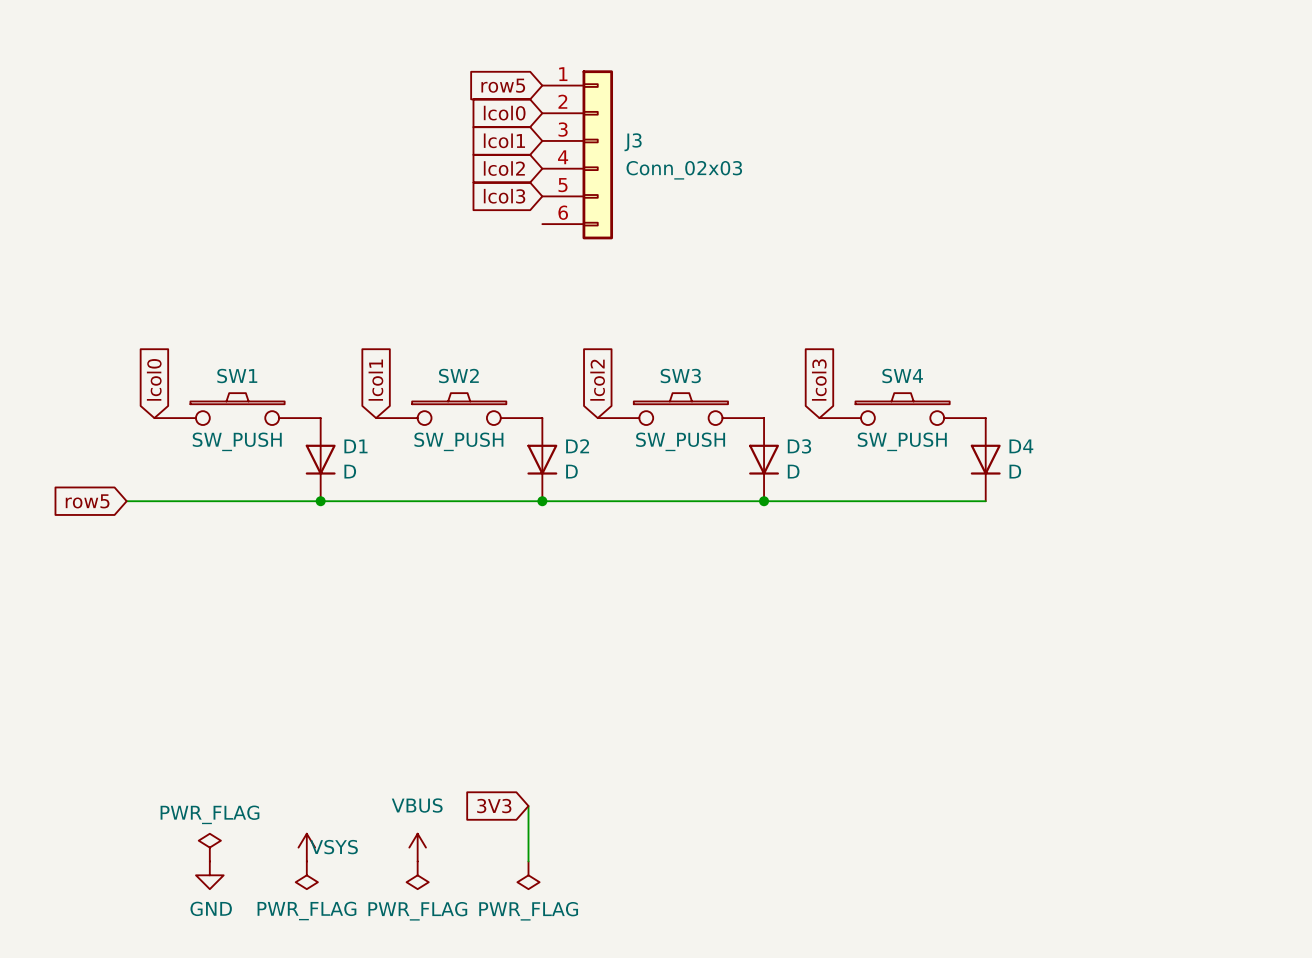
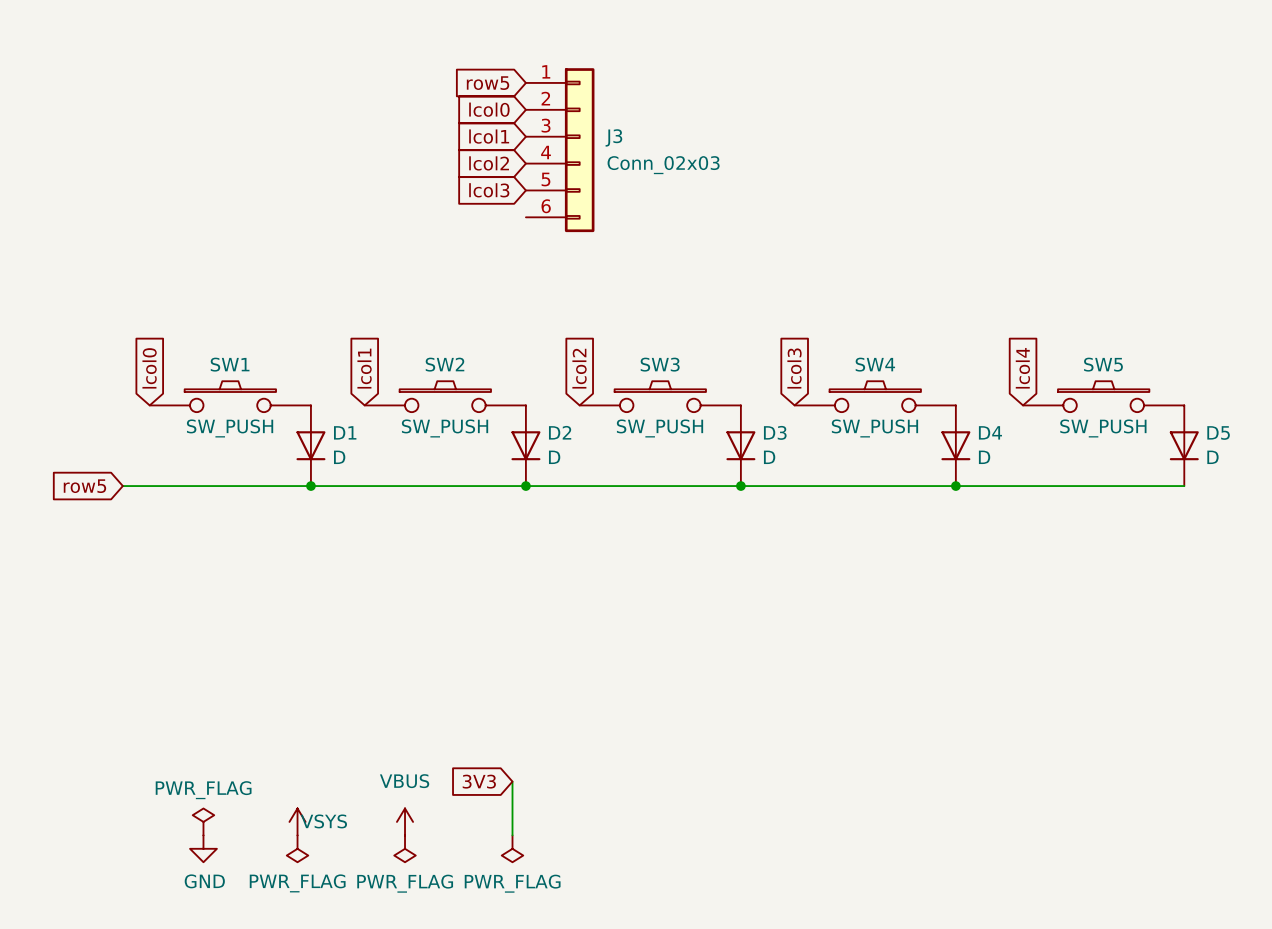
global label: none -> lcol4 (1022, 368)
SW5: none -> SW_PUSH (1103, 396)
D5: none -> D (1184, 445)
wire: none -> (955, 486) (1184, 486)
junction: none -> (955, 486)

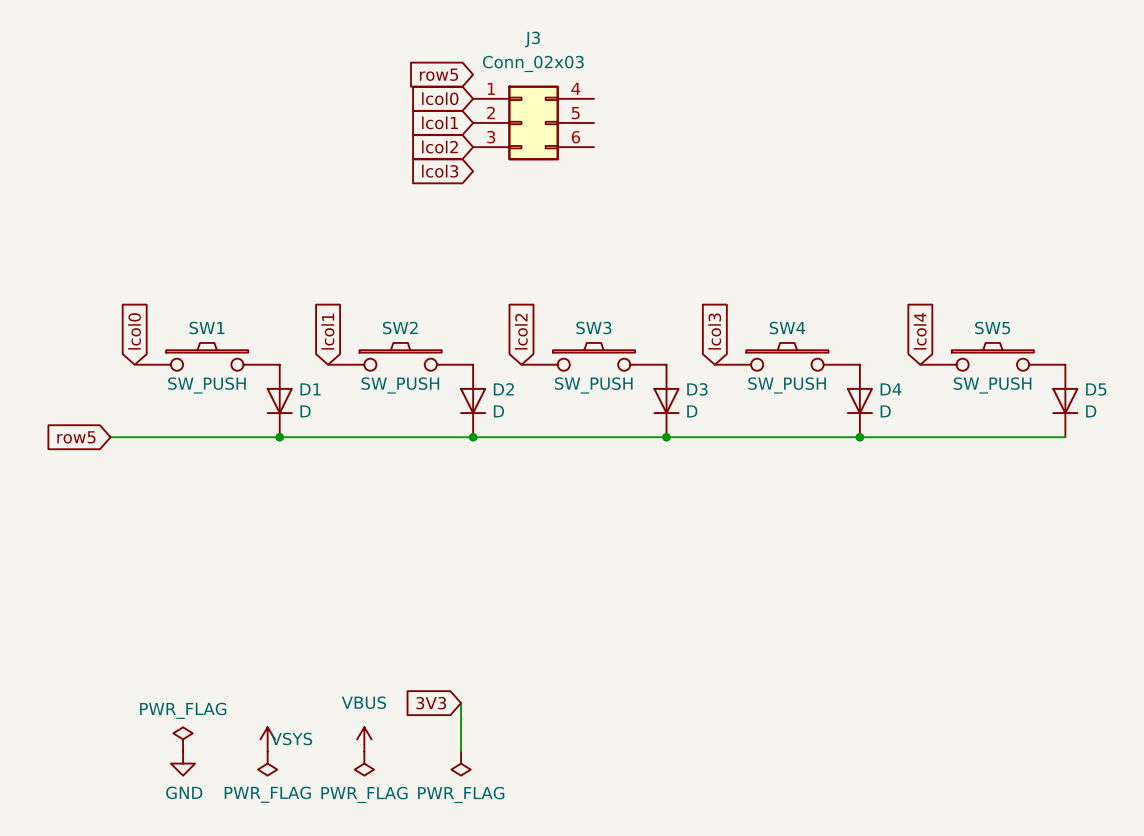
J3 symbol: [525, 68, 595, 233] -> [473, 85, 594, 161]
J3 name position: J3 (613, 137) -> J3 (532, 39)
J3 value position: Conn_02x03 (663, 165) -> Conn_02x03 (533, 63)

